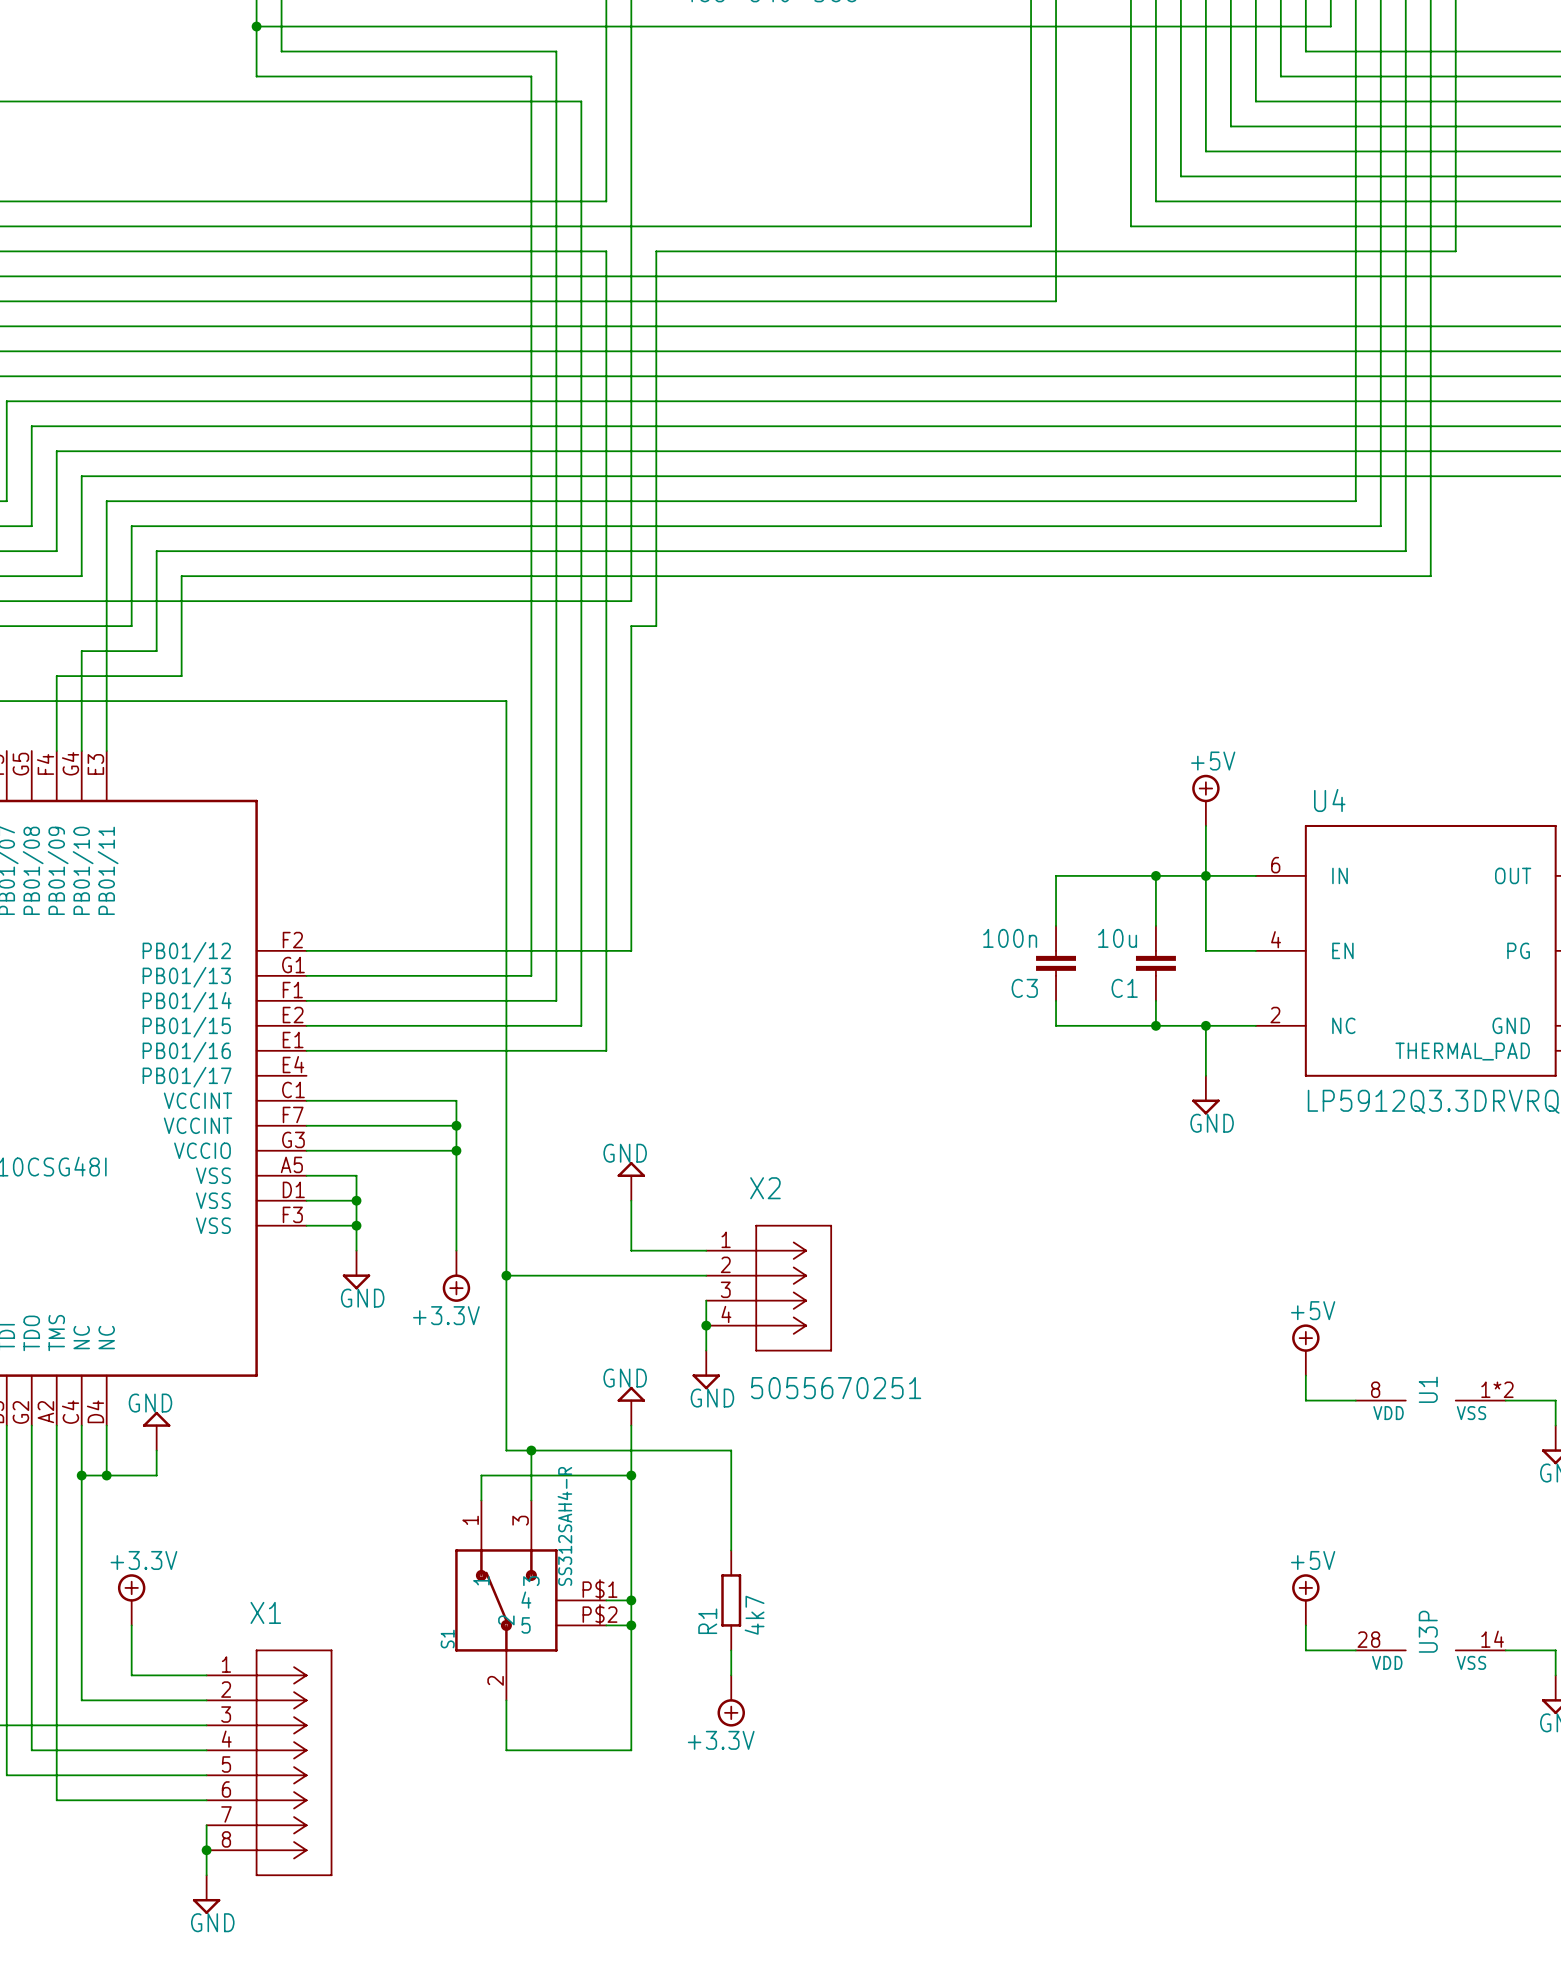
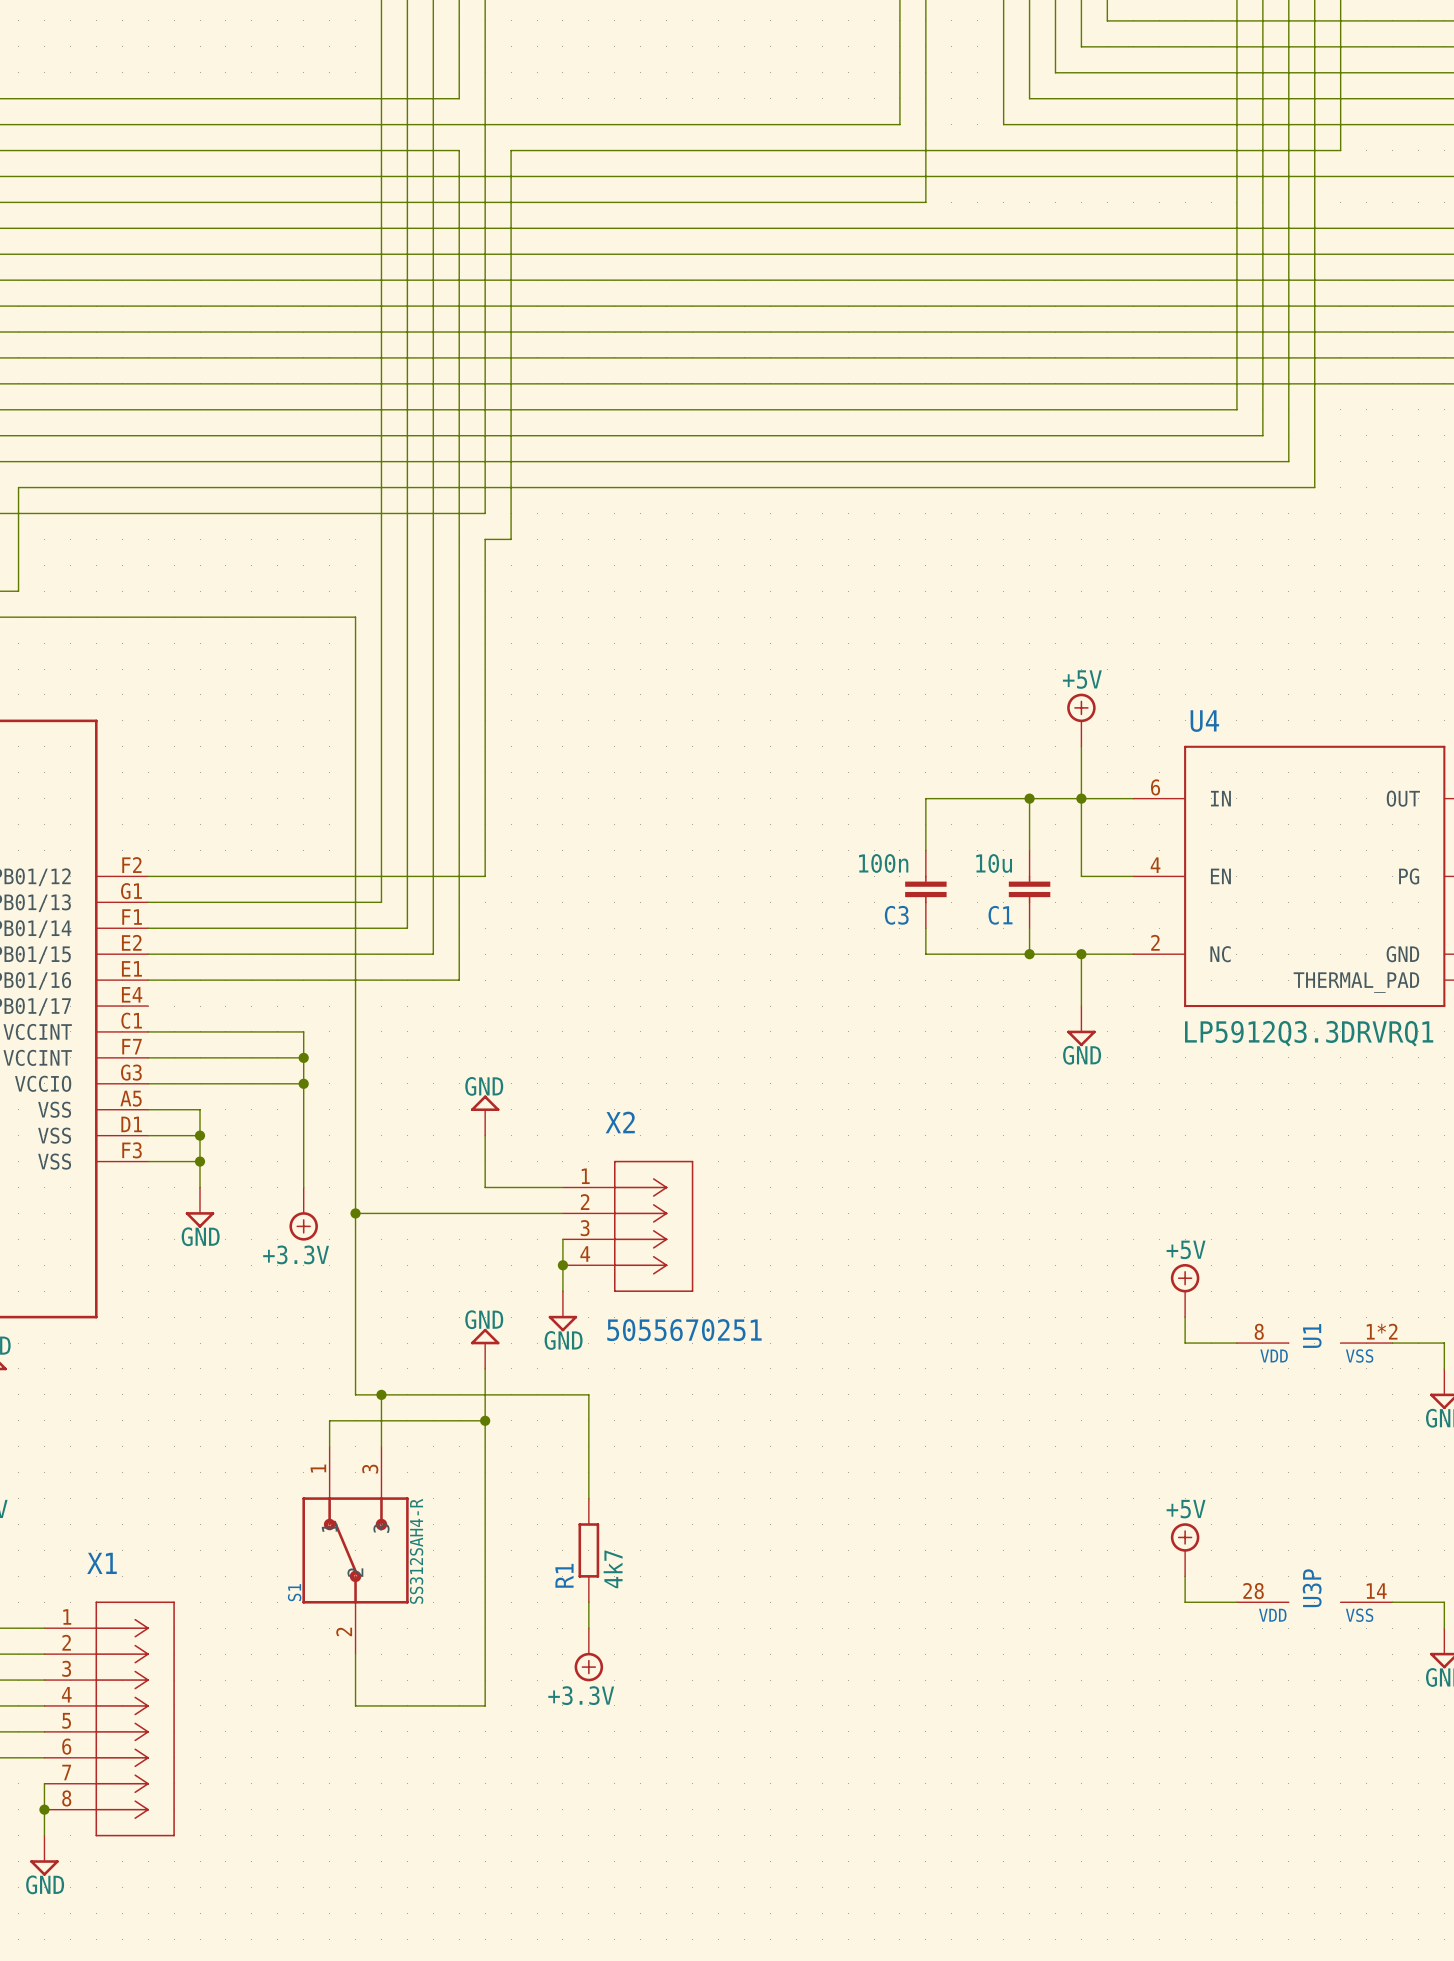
S1 symbol: [455, 1500, 607, 1701] -> [302, 1446, 409, 1655]
S1 value position: SS312SAH4-R (564, 1526) -> SS312SAH4-R (416, 1551)
wire: (606, 1600) (631, 1600) -> none
junction: (631, 1600) -> none
wire: (606, 1625) (631, 1625) -> none
junction: (631, 1625) -> none

